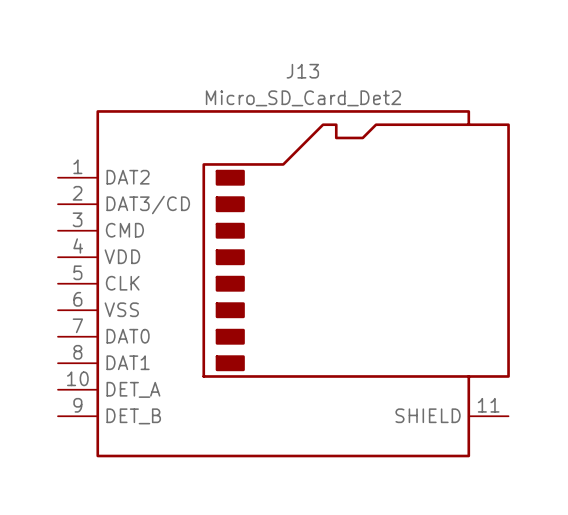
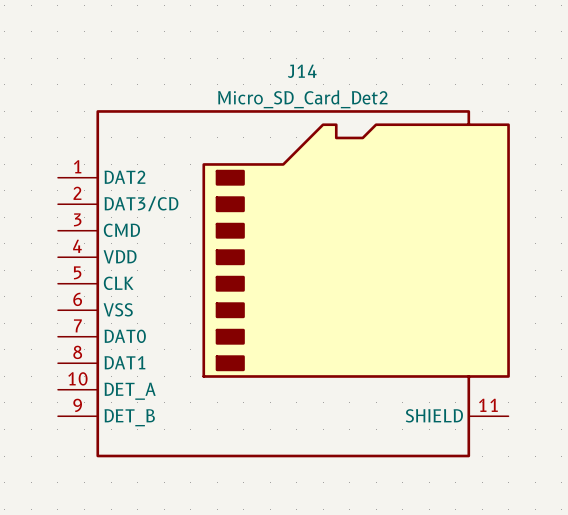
J13 name: J13 (302, 71) -> J14 (302, 71)

